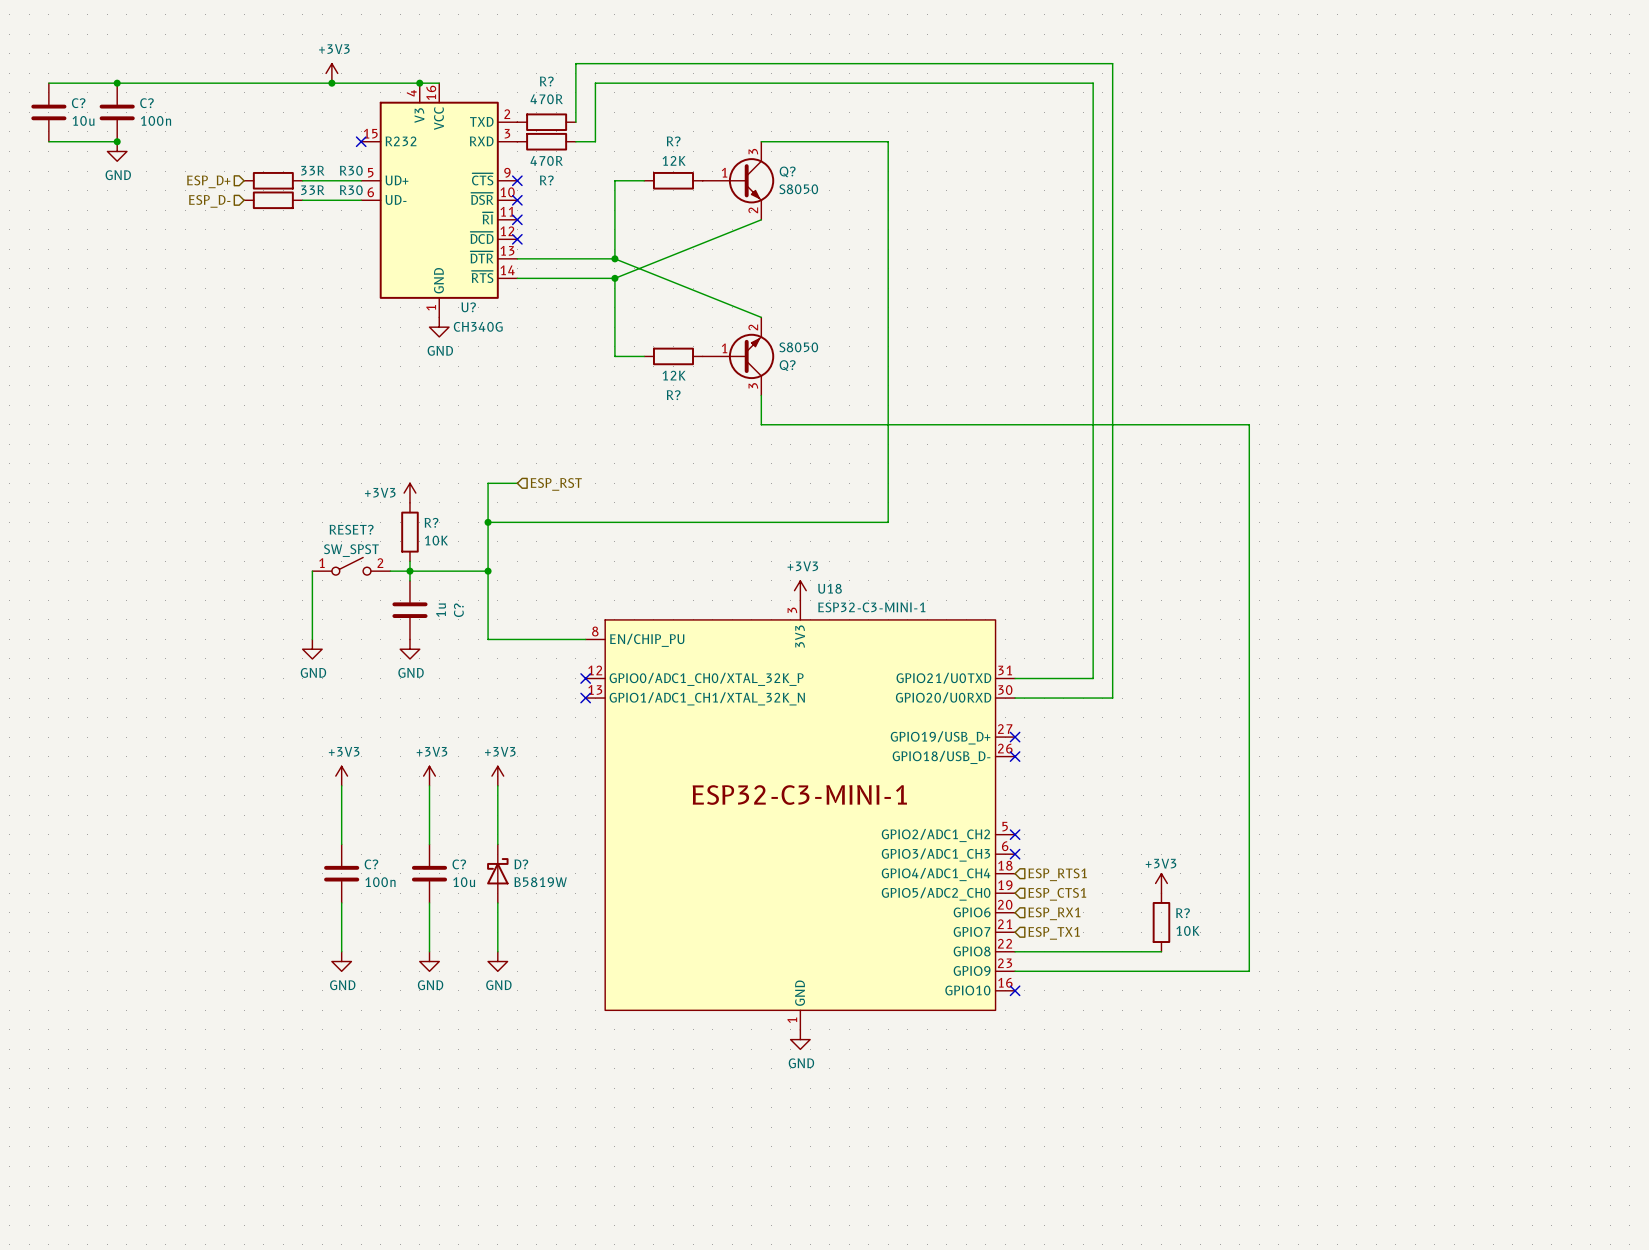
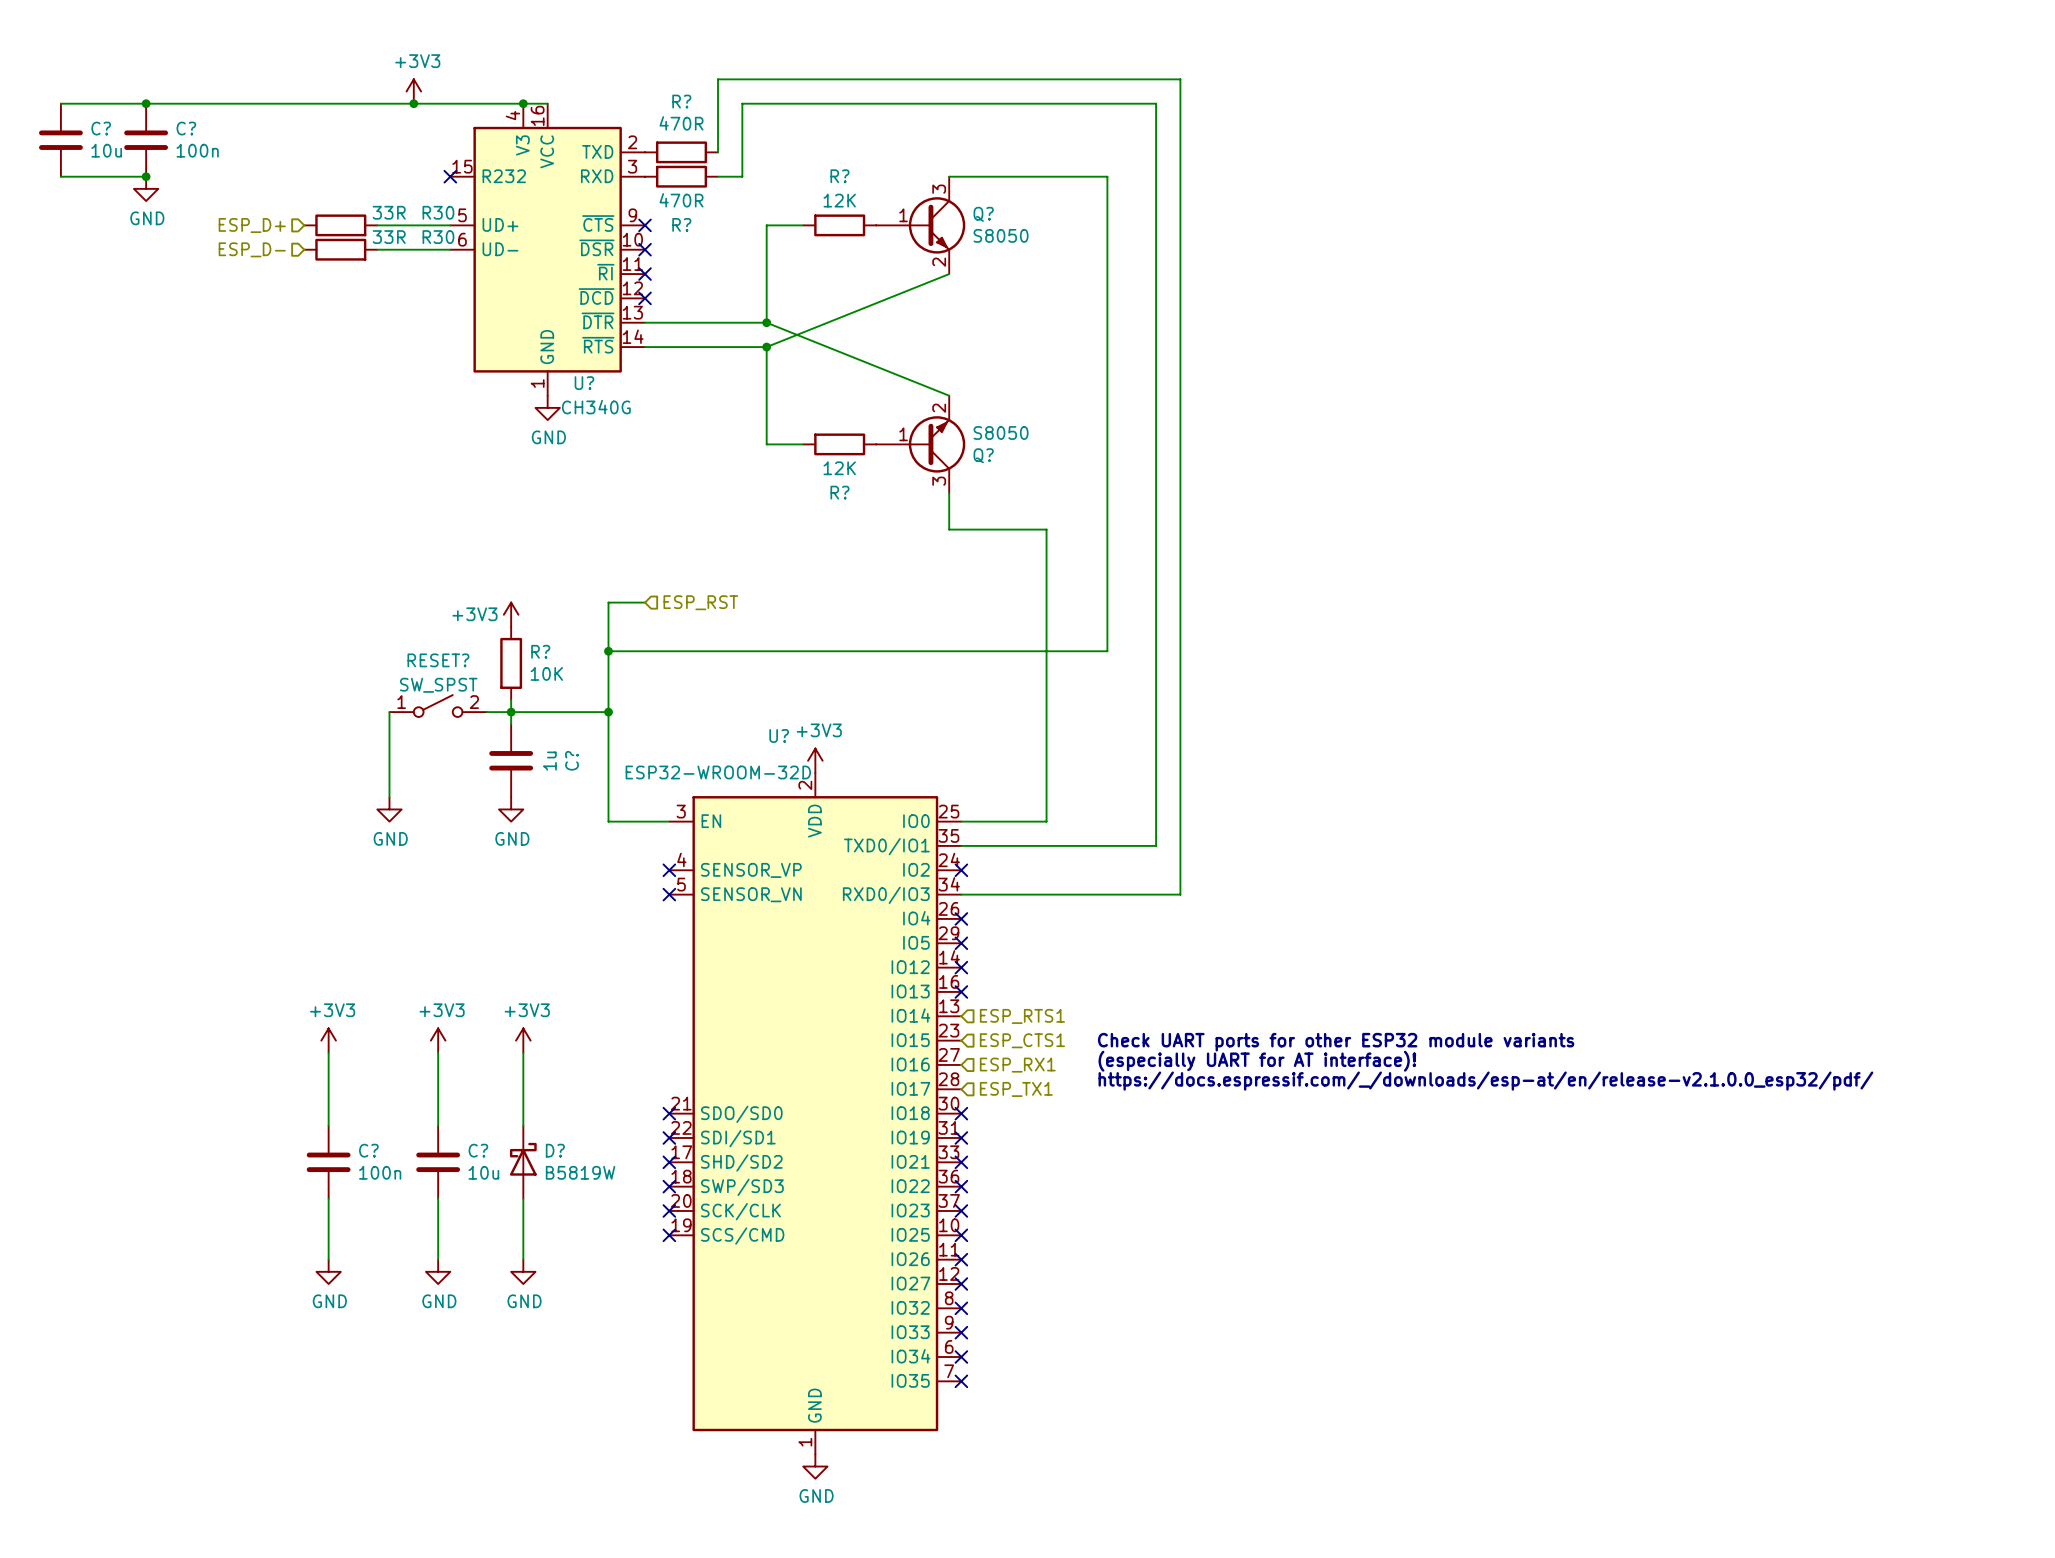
wire: (946, 63) (1112, 63) (1112, 698) (1015, 698) -> (1180, 79) (1180, 894) (961, 894)
wire: (927, 83) (1093, 83) (1093, 678) (1015, 678) -> (1156, 103) (1156, 845) (961, 845)
wire: (839, 424) (1249, 424) (1249, 971) (1015, 971) -> (1046, 529) (1046, 821) (961, 821)
power symbol: +3V3 (800, 590) -> none
power symbol: none -> +3V3 (815, 760)
wire: (488, 639) (585, 639) -> (608, 797) (608, 821) (669, 821)
no-connect mark: (585, 678) -> none
no-connect mark: none -> (669, 870)
no-connect mark: (585, 698) -> none
no-connect mark: none -> (961, 870)
no-connect mark: none -> (669, 894)
no-connect mark: none -> (961, 918)
no-connect mark: (1015, 737) -> none
no-connect mark: none -> (961, 943)
no-connect mark: (1015, 756) -> none
power symbol: +3V3 (341, 776) -> none
power symbol: +3V3 (429, 776) -> none
power symbol: +3V3 (497, 776) -> none
no-connect mark: none -> (961, 967)
wire: (341, 785) (341, 844) -> (328, 1052) (328, 1125)
wire: (429, 785) (429, 844) -> (438, 1052) (438, 1125)
wire: (497, 785) (497, 844) -> (523, 1052) (523, 1125)
no-connect mark: none -> (961, 991)
U18: ESP32-C3-MINI-1 (800, 815) -> none
hierarchical label: none -> ESP_RTS1 (1022, 1016)
power symbol: none -> +3V3 (328, 1040)
power symbol: none -> +3V3 (438, 1040)
power symbol: none -> +3V3 (523, 1040)
no-connect mark: (1015, 834) -> none
hierarchical label: none -> ESP_CTS1 (1022, 1040)
text: none -> Check UART ports for other ESP32 module variants (1336, 1042)
text: none -> (especially UART for AT interface)! (1257, 1061)
no-connect mark: (1015, 854) -> none
hierarchical label: none -> ESP_RX1 (1017, 1065)
text: none -> https://docs.espressif.com/_/downloads/esp-at/en/release-v2.1.0.0_esp32/pdf/ (1485, 1081)
C? position: (341, 873) -> (328, 1162)
C? position: (429, 873) -> (438, 1162)
D? position: (497, 873) -> (523, 1162)
hierarchical label: none -> ESP_TX1 (1016, 1089)
hierarchical label: ESP_RTS1 (1057, 874) -> none
power symbol: +3V3 (1161, 883) -> none
no-connect mark: none -> (669, 1113)
U?: none -> ESP32-WROOM-32D (815, 1113)
no-connect mark: none -> (961, 1113)
hierarchical label: ESP_CTS1 (1057, 894) -> none
wire: (341, 902) (341, 951) -> (328, 1198) (328, 1259)
wire: (429, 902) (429, 951) -> (438, 1198) (438, 1259)
wire: (497, 902) (497, 951) -> (523, 1198) (523, 1259)
no-connect mark: none -> (669, 1137)
no-connect mark: none -> (961, 1137)
hierarchical label: ESP_RX1 (1054, 913) -> none
R?: 10K (1161, 922) -> none
no-connect mark: none -> (669, 1162)
no-connect mark: none -> (961, 1162)
hierarchical label: ESP_TX1 (1054, 933) -> none
no-connect mark: none -> (669, 1186)
no-connect mark: none -> (961, 1186)
wire: (1015, 951) (1161, 951) -> none
power symbol: GND (341, 961) -> none
power symbol: GND (429, 961) -> none
power symbol: GND (497, 961) -> none
no-connect mark: none -> (669, 1210)
no-connect mark: none -> (961, 1210)
no-connect mark: none -> (669, 1235)
no-connect mark: none -> (961, 1235)
no-connect mark: (1015, 990) -> none
no-connect mark: none -> (961, 1259)
power symbol: none -> GND (328, 1271)
power symbol: none -> GND (438, 1271)
power symbol: none -> GND (523, 1271)
no-connect mark: none -> (961, 1284)
power symbol: GND (800, 1039) -> none
no-connect mark: none -> (961, 1308)
no-connect mark: none -> (961, 1332)
no-connect mark: none -> (961, 1357)
no-connect mark: none -> (961, 1381)
power symbol: none -> GND (815, 1466)

